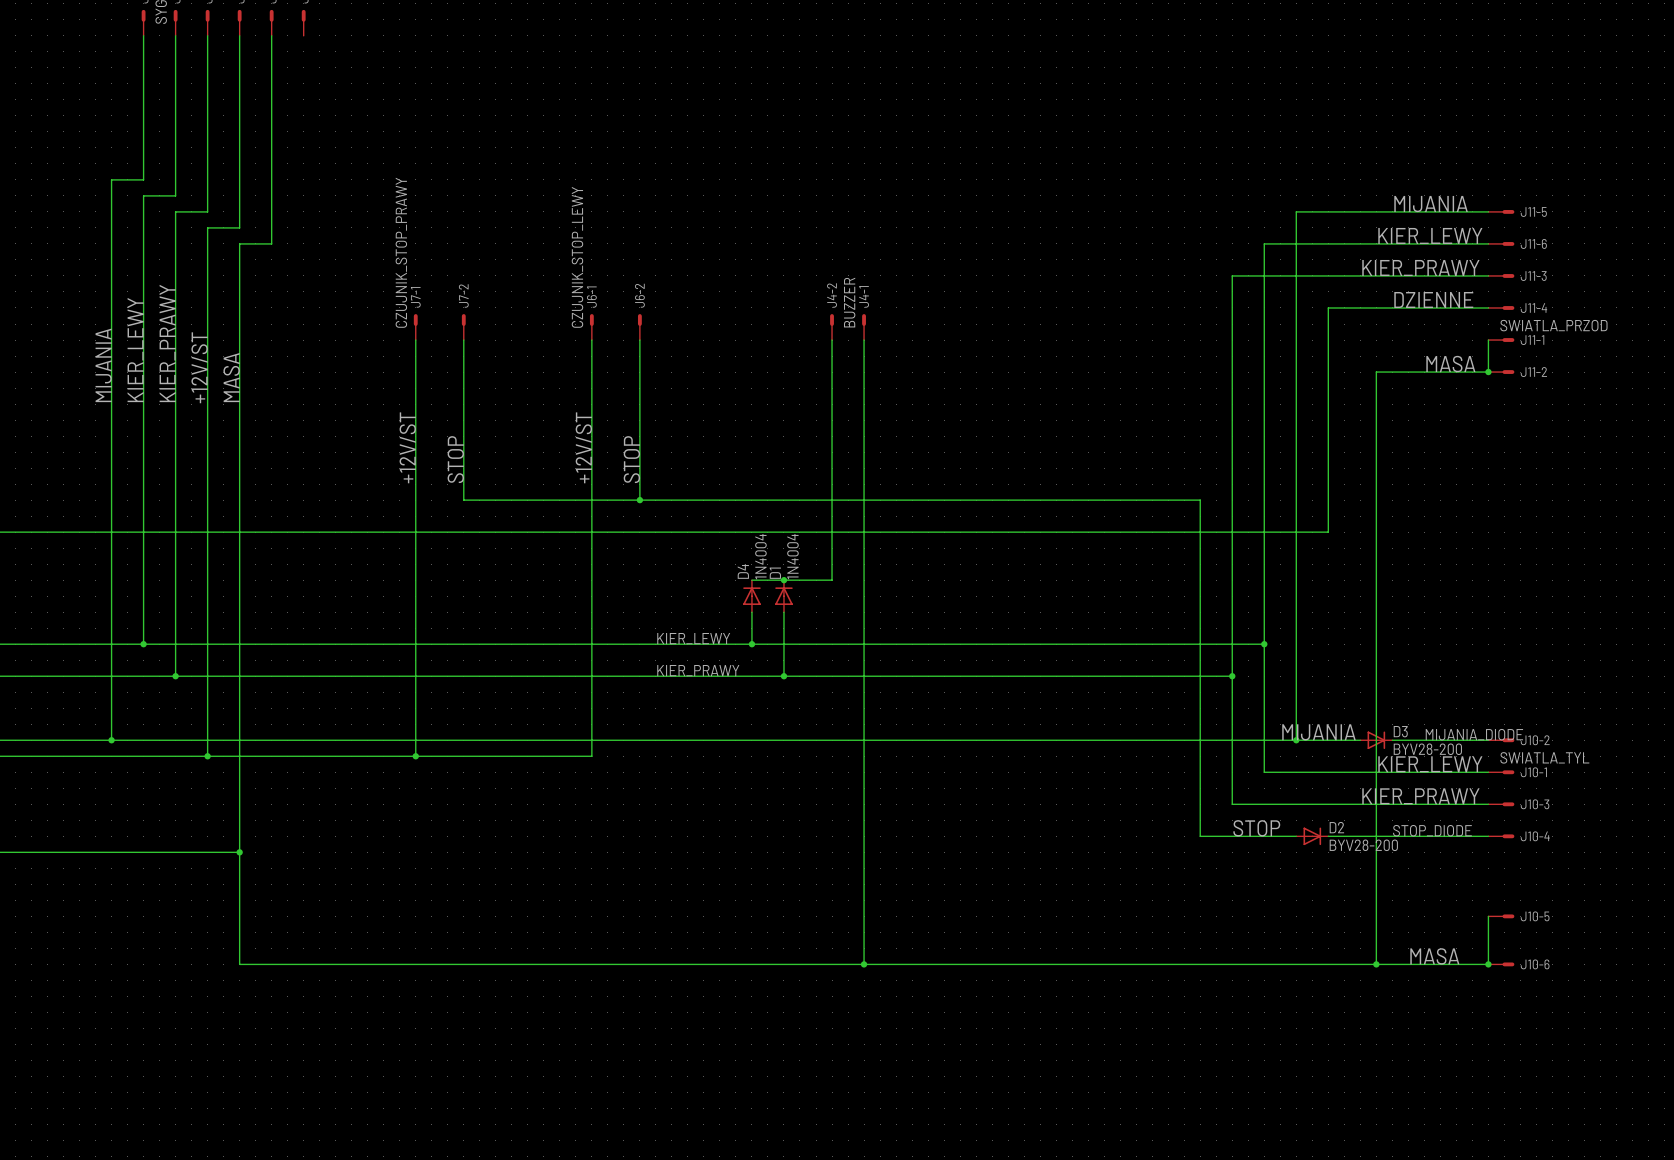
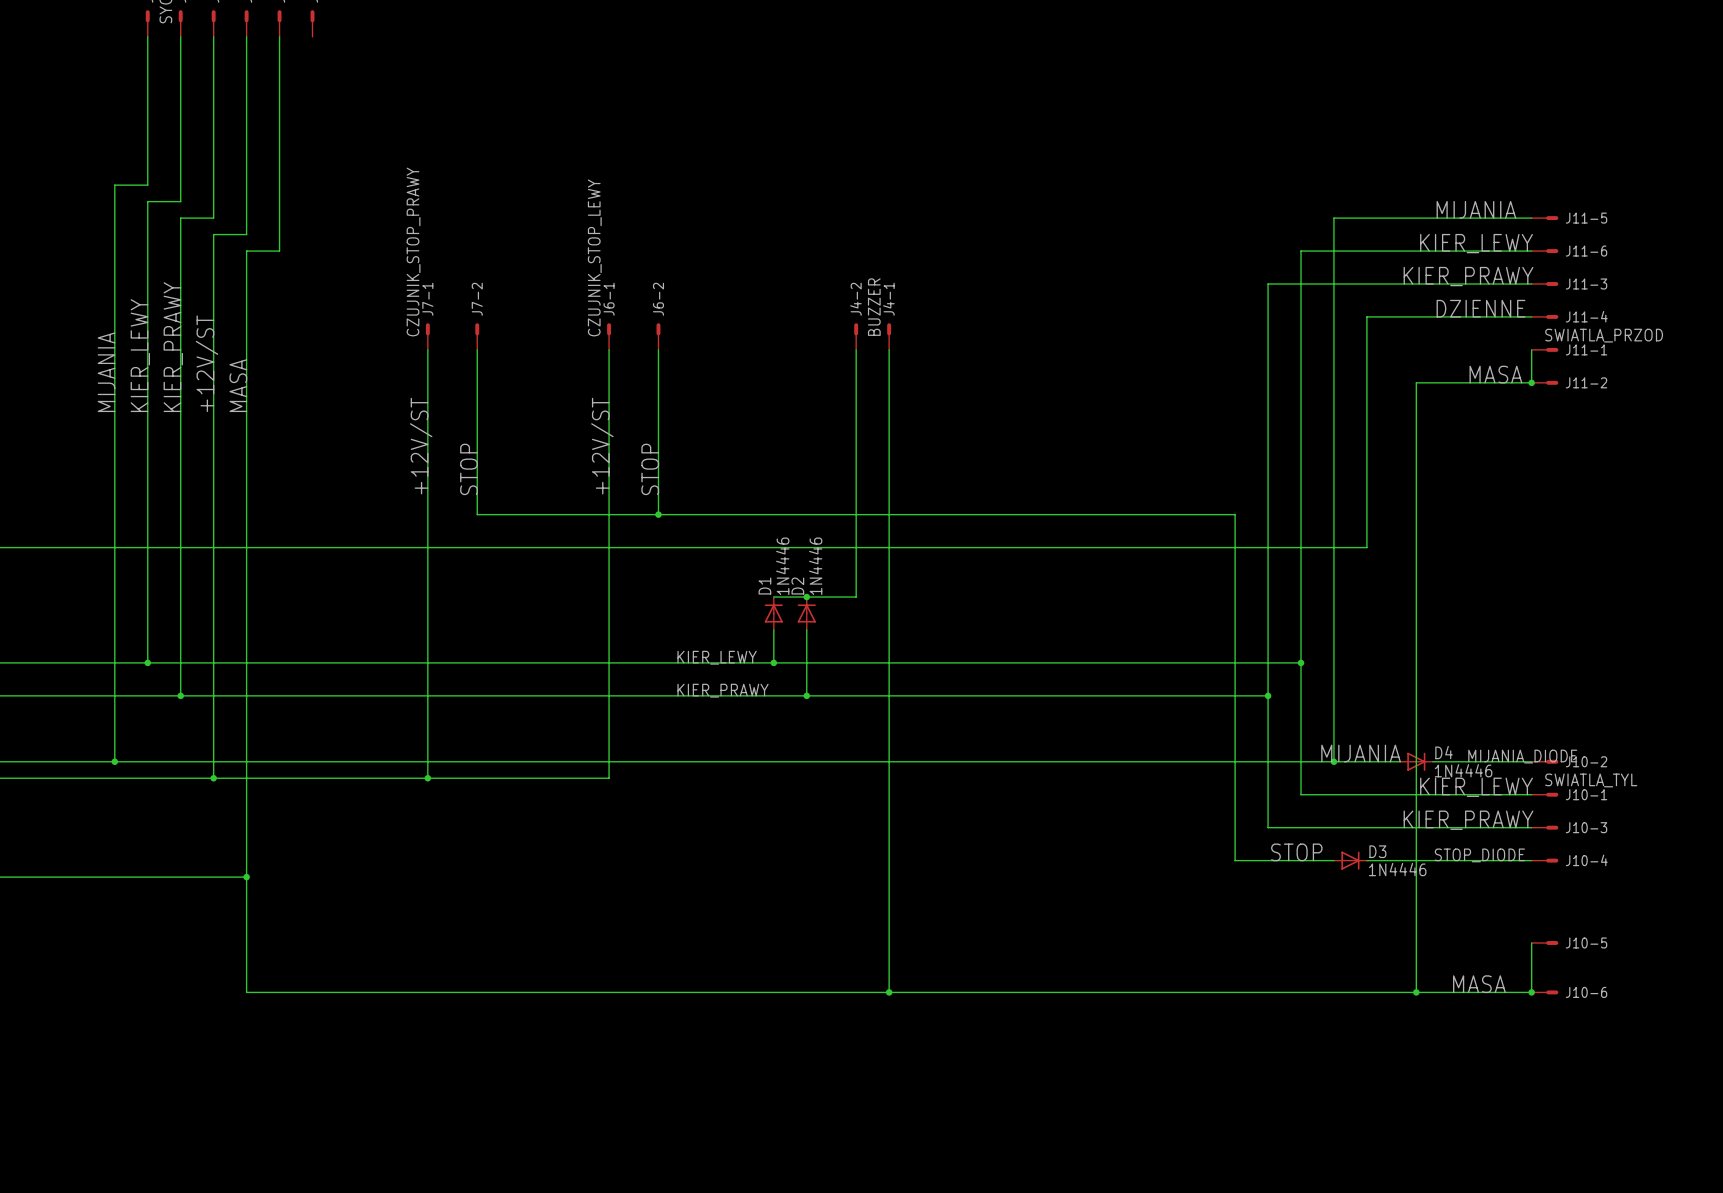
D4 value: 1N4004 (760, 556) -> 1N4446 (782, 566)
D1 value: 1N4004 (792, 556) -> 1N4446 (815, 566)
D4 name: D4 (743, 571) -> D1 (764, 586)
D1 name: D1 (775, 573) -> D2 (797, 586)
D3 name: D3 (1400, 731) -> D4 (1444, 752)
D3 value: BYV28-200 (1427, 749) -> 1N4446 (1463, 770)
D2 name: D2 (1336, 827) -> D3 (1377, 851)
D2 value: BYV28-200 (1363, 845) -> 1N4446 (1397, 869)

